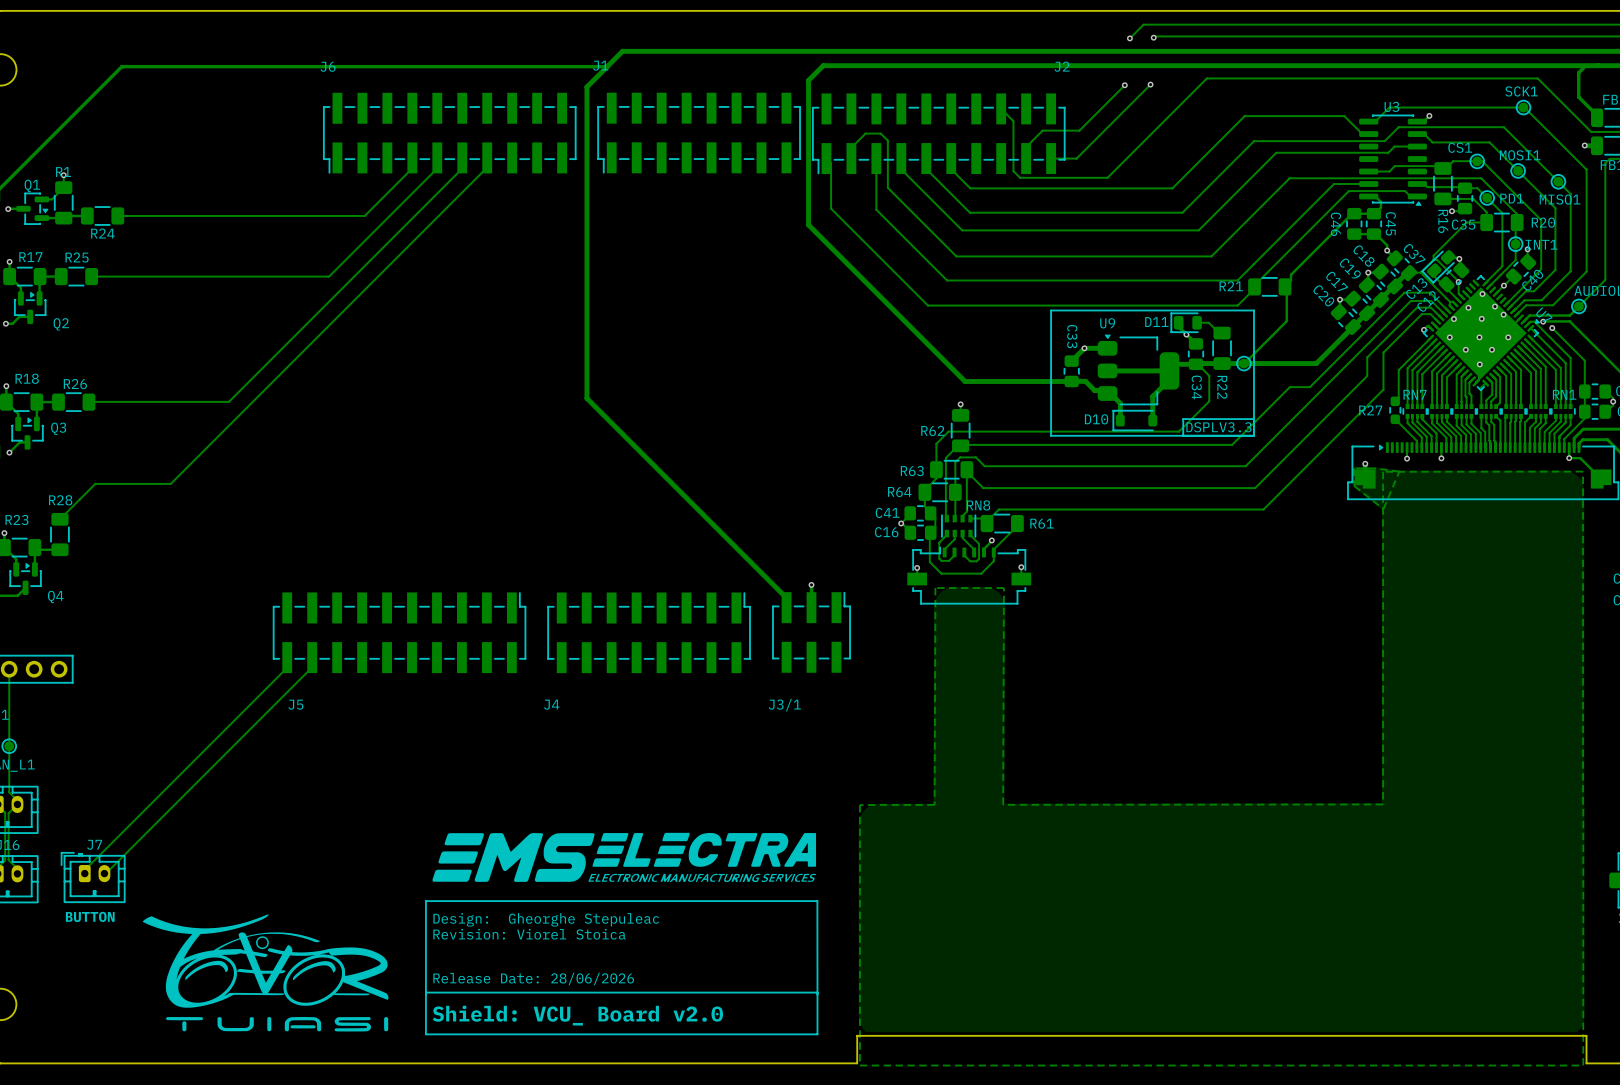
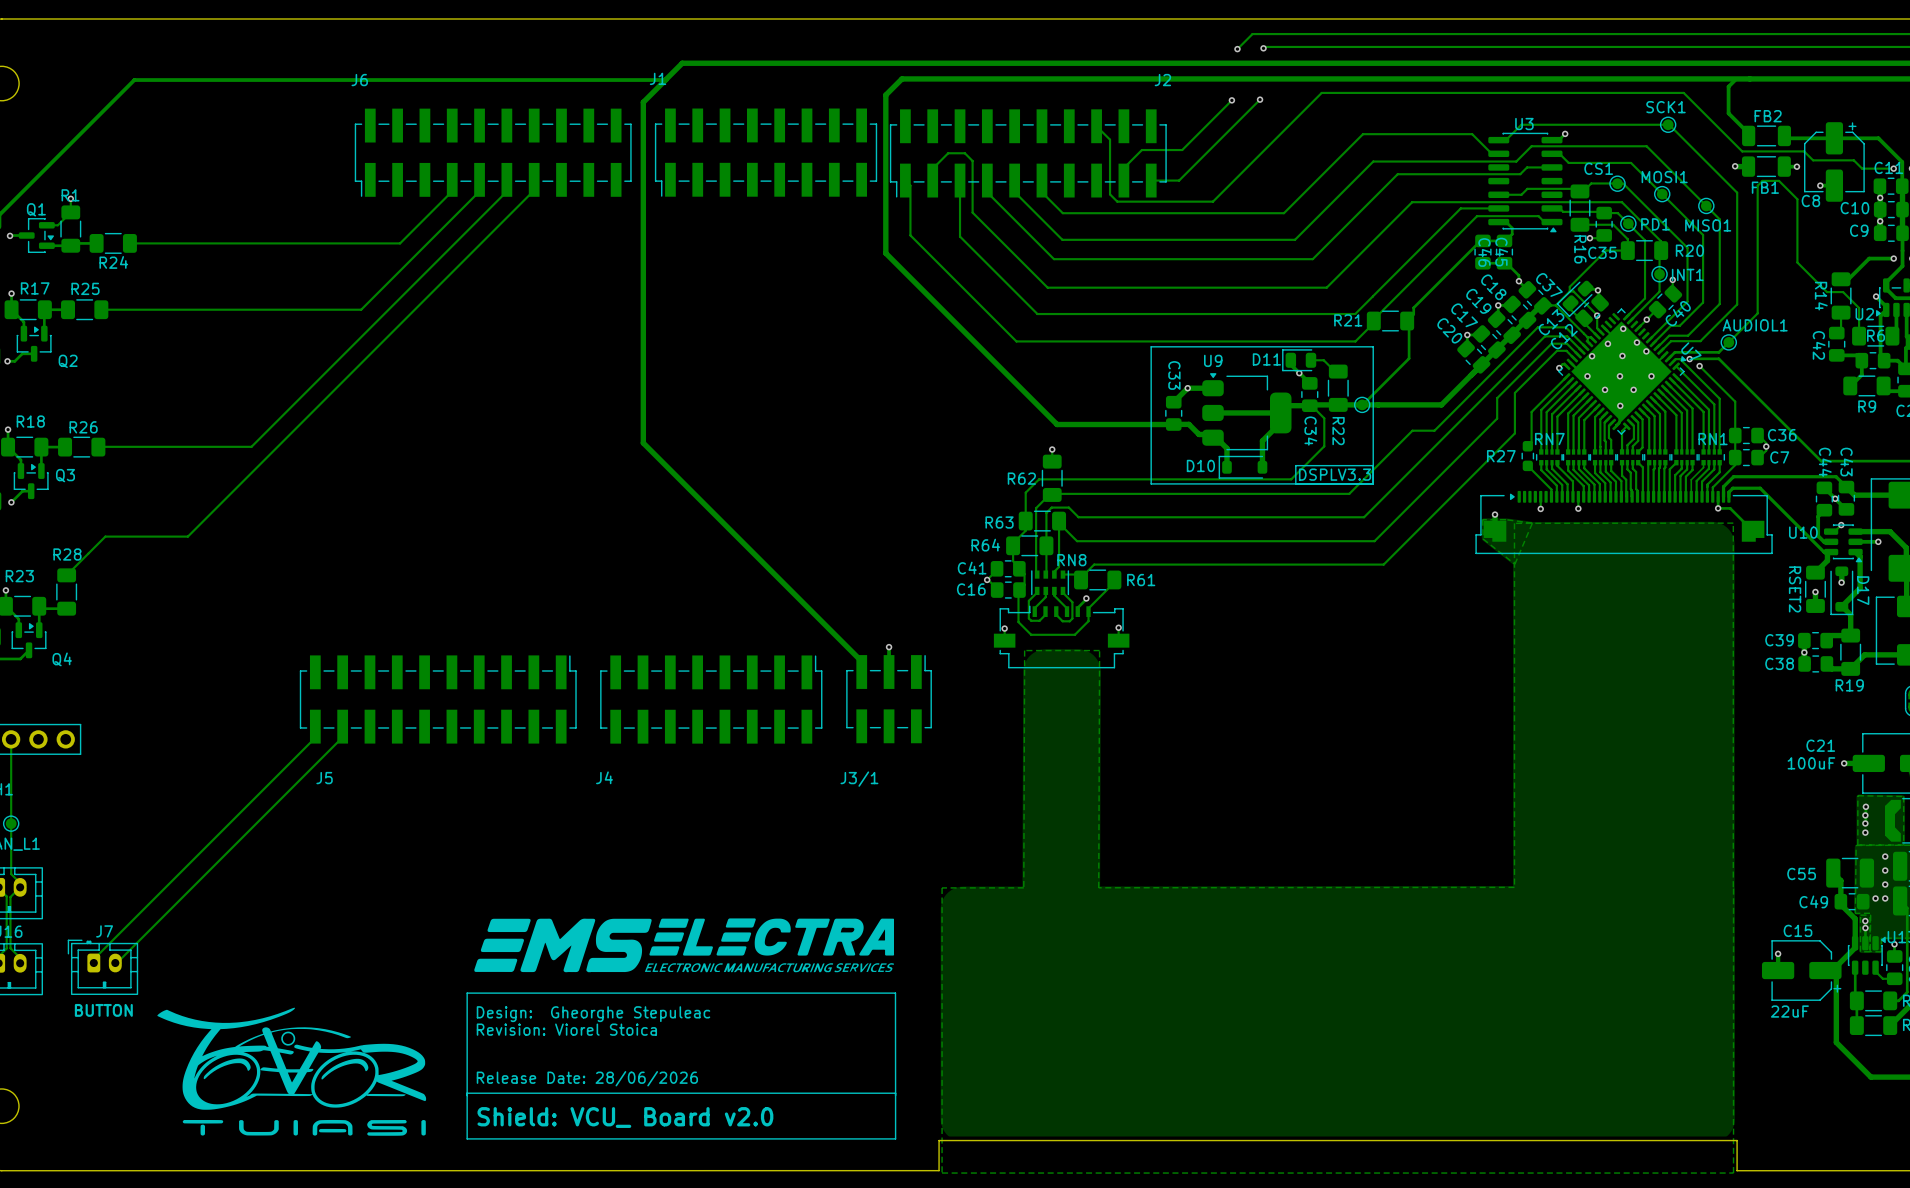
C45 name: C45 (1390, 223) -> C46 (1484, 252)
C46 name: C46 (1335, 224) -> C45 (1501, 252)

